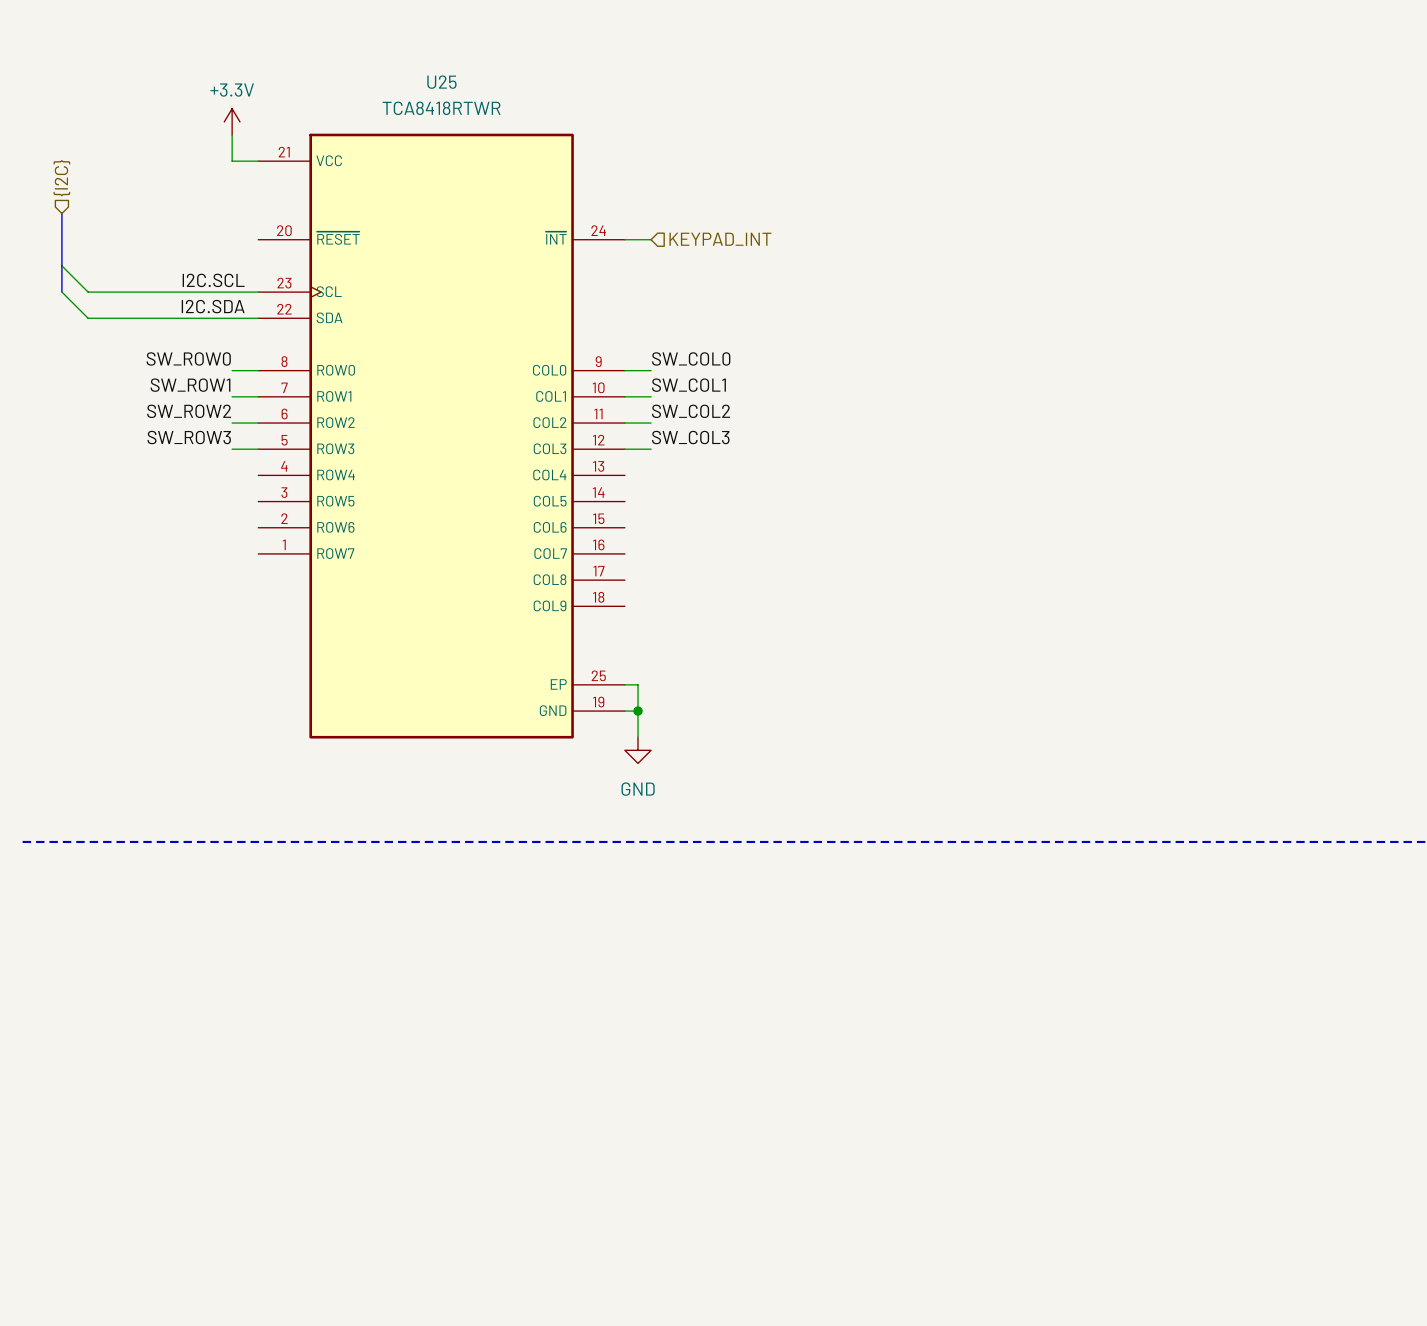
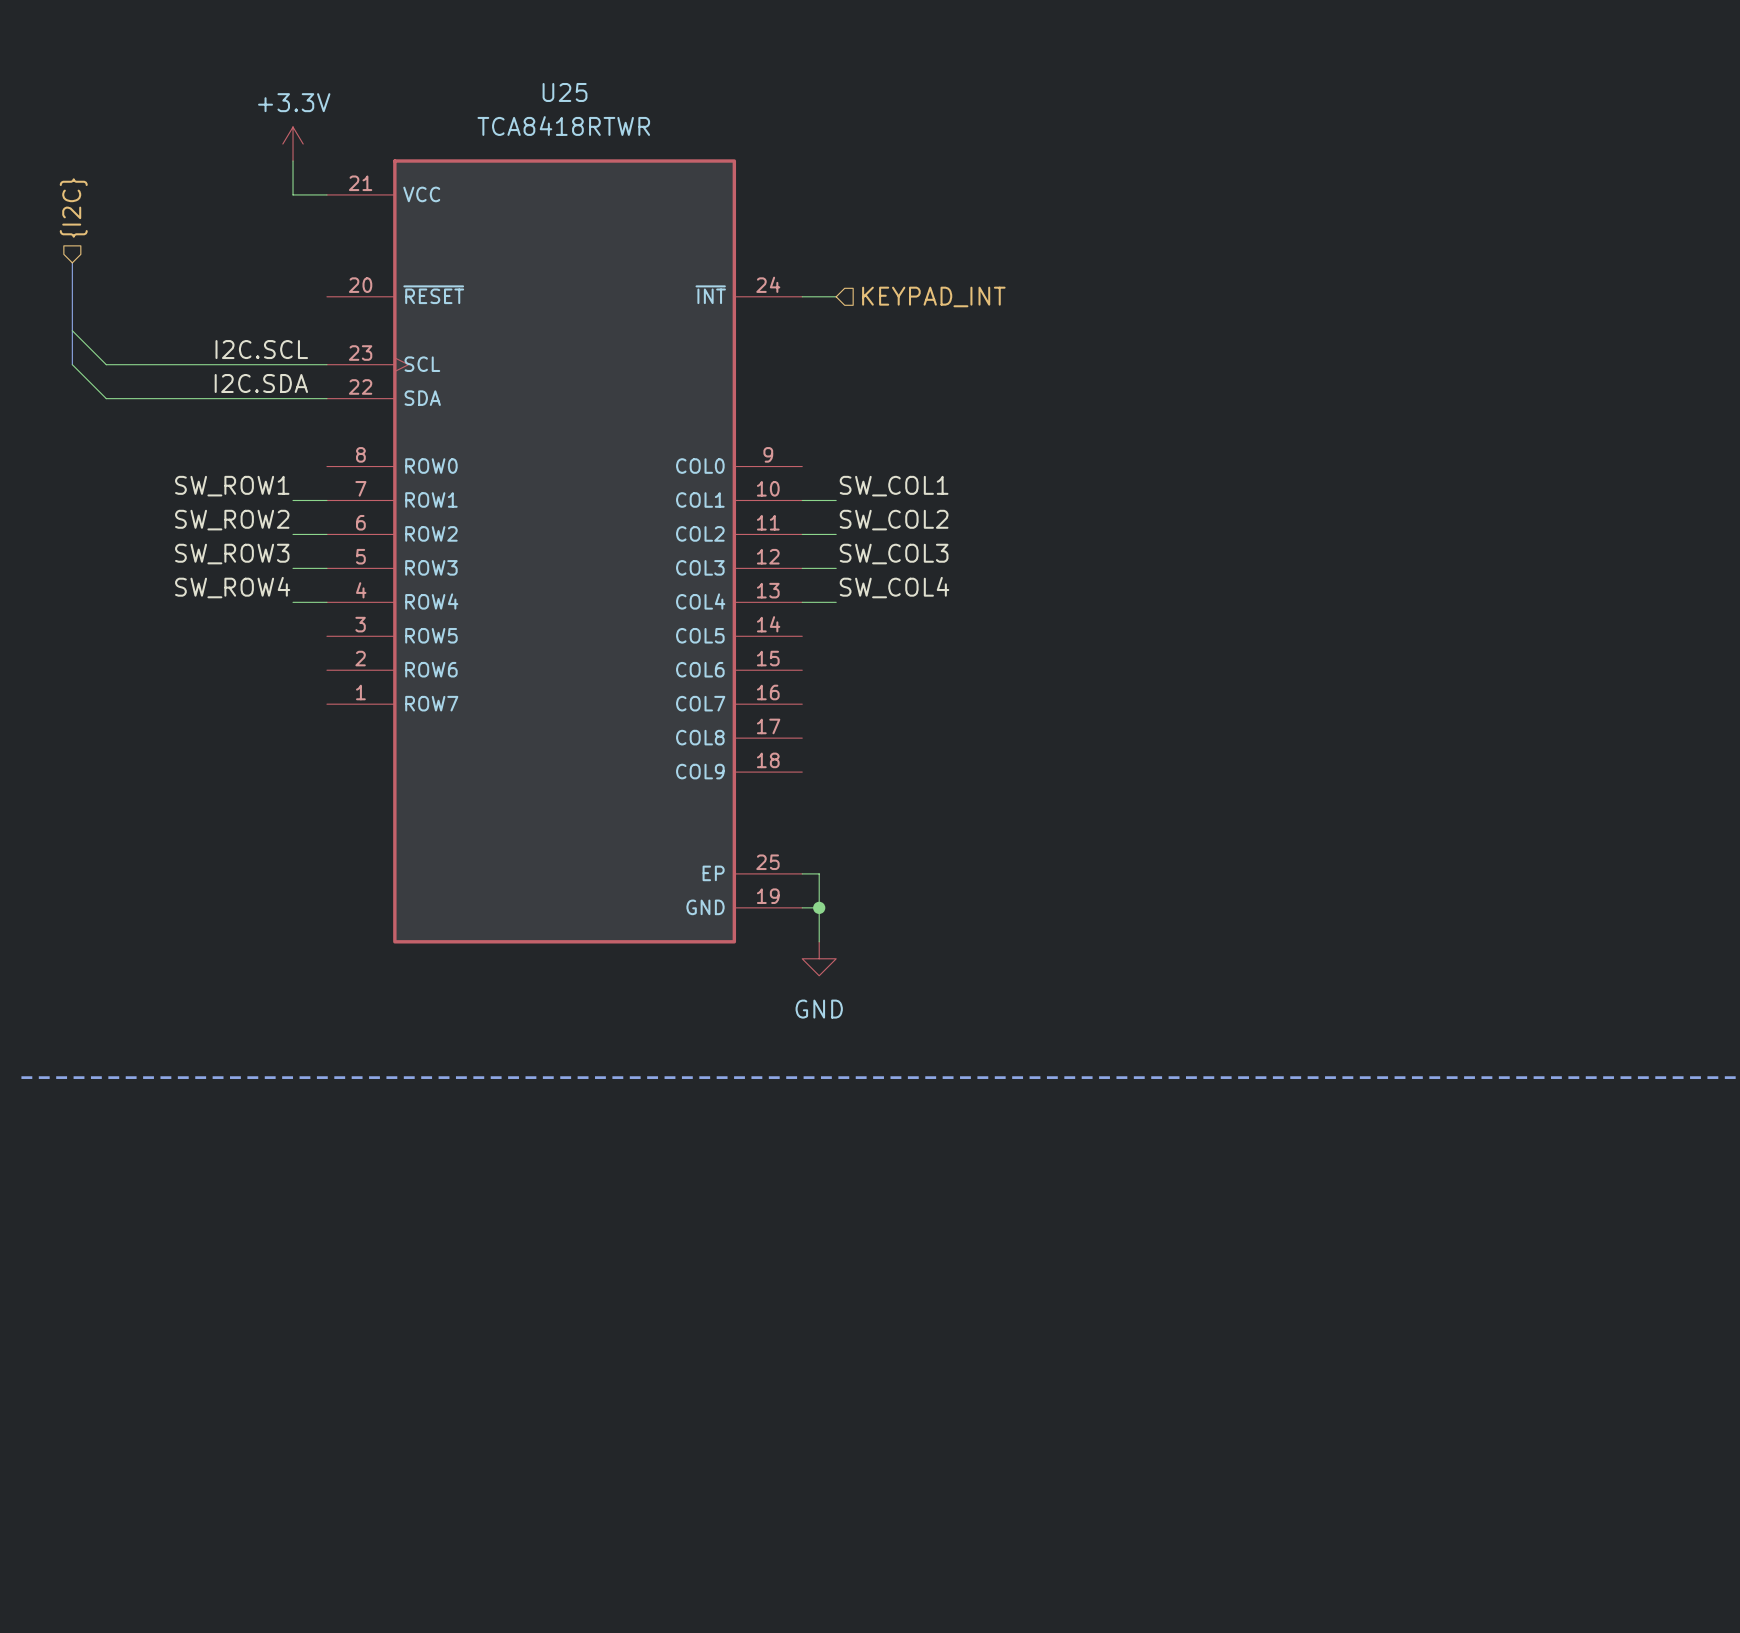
label: SW_ROW0 (188, 358) -> none
label: SW_COL0 (691, 358) -> none
wire: (232, 370) (258, 370) -> (293, 602) (326, 602)
wire: (624, 370) (651, 370) -> (802, 602) (836, 602)
label: none -> SW_ROW4 (232, 587)
label: none -> SW_COL4 (894, 587)

